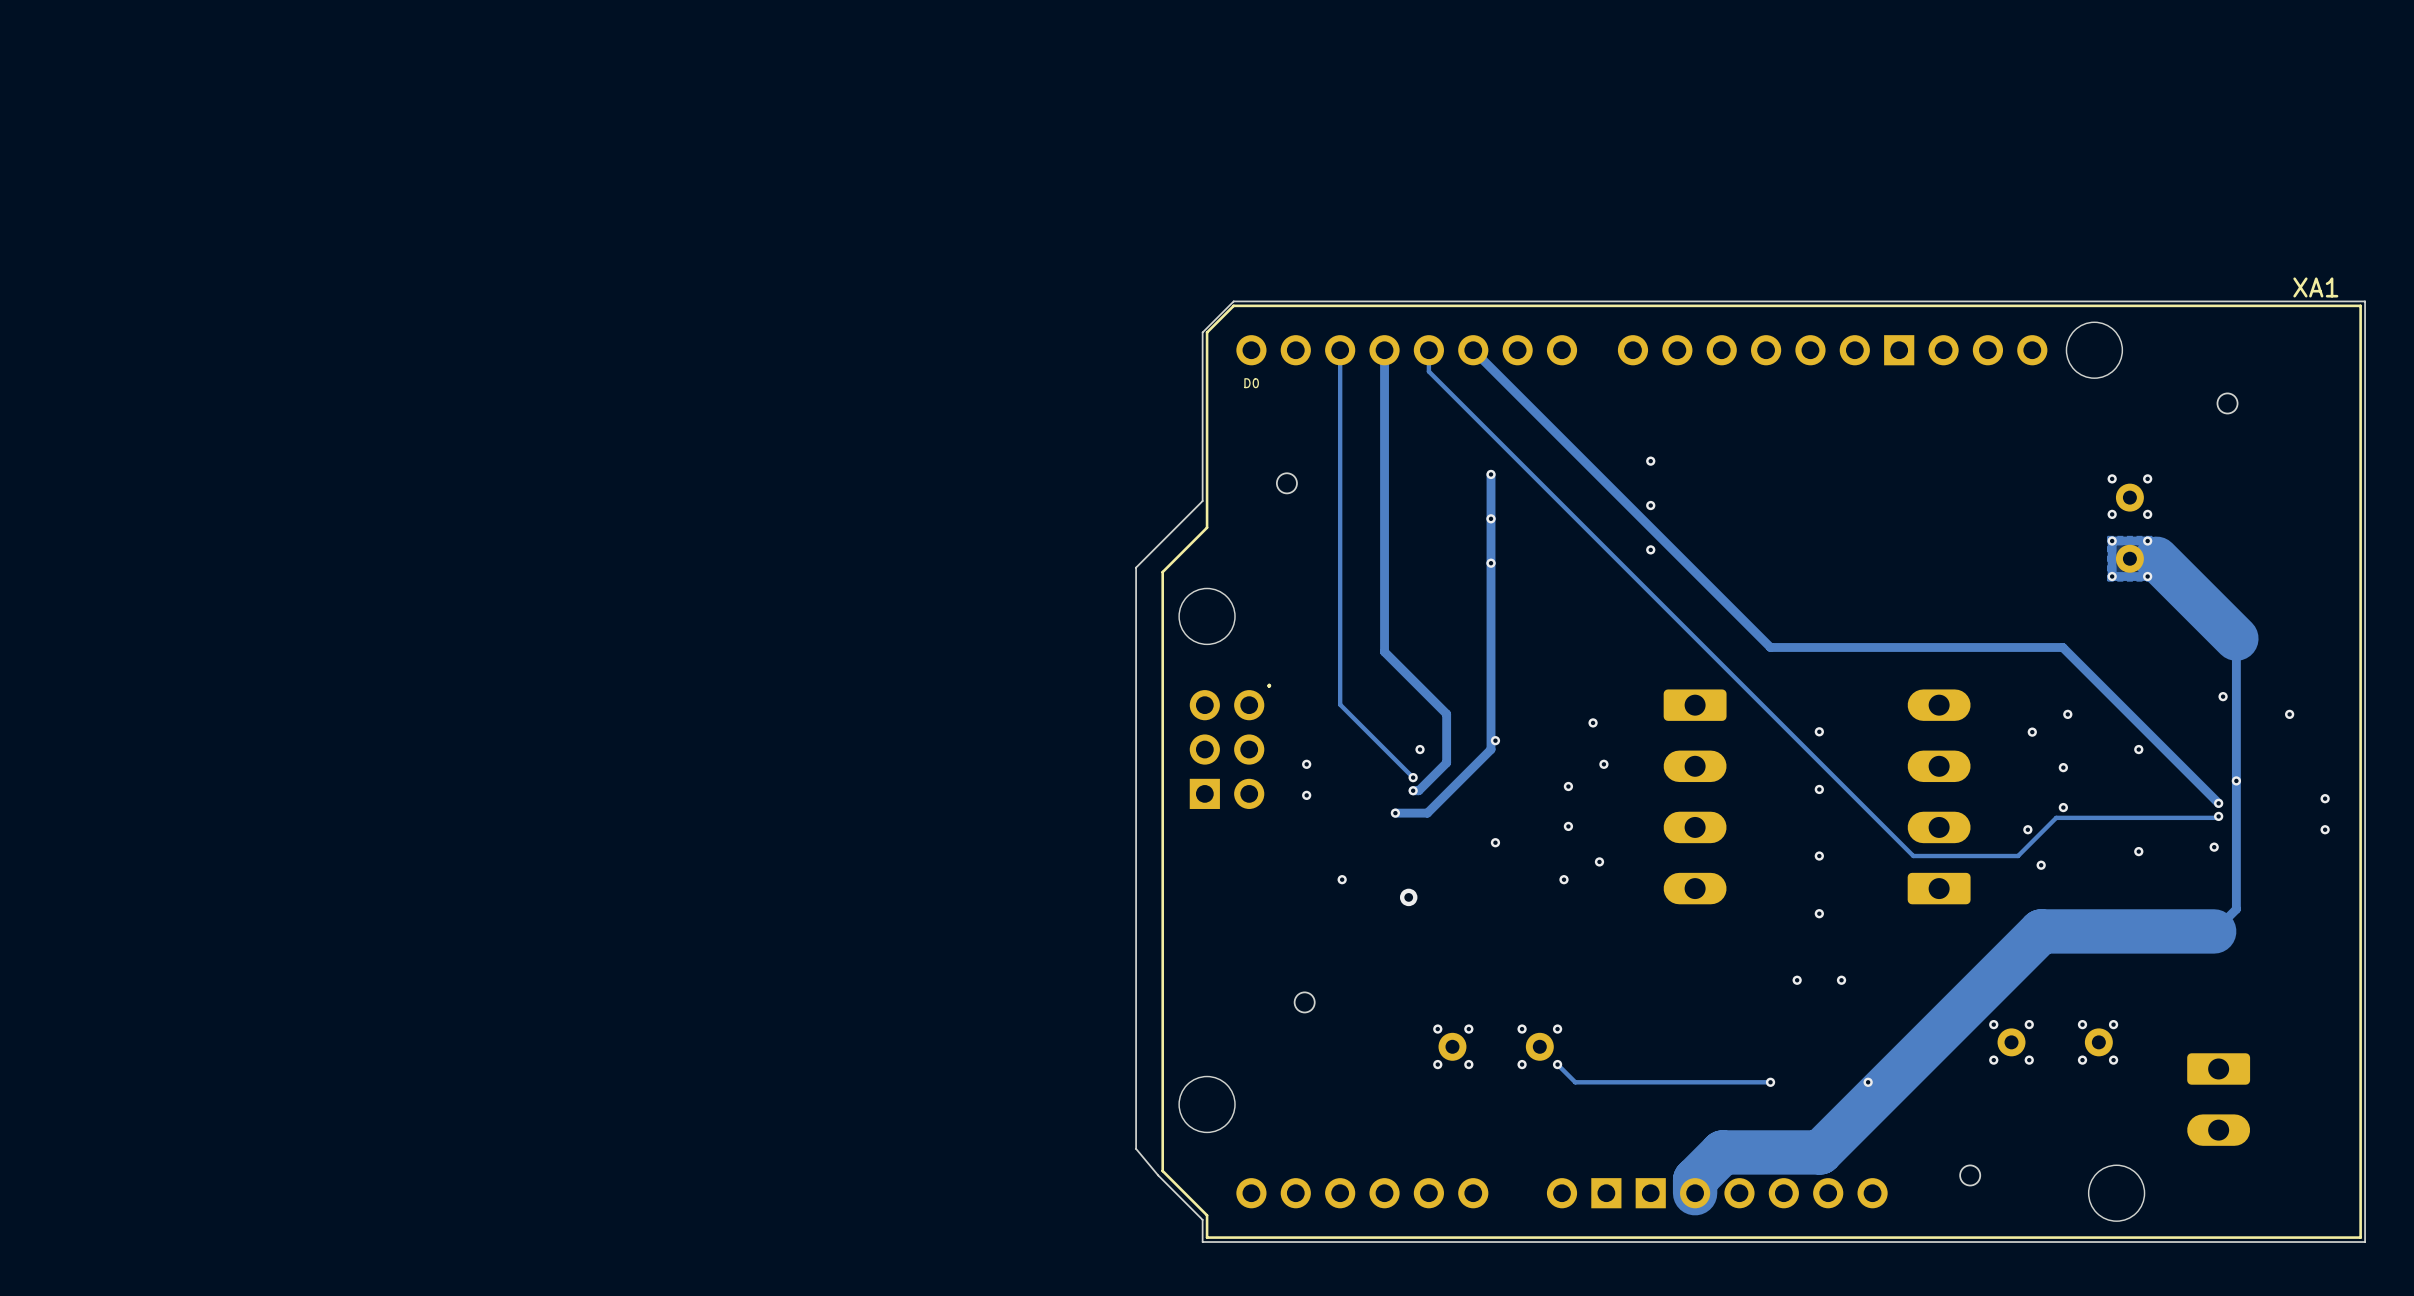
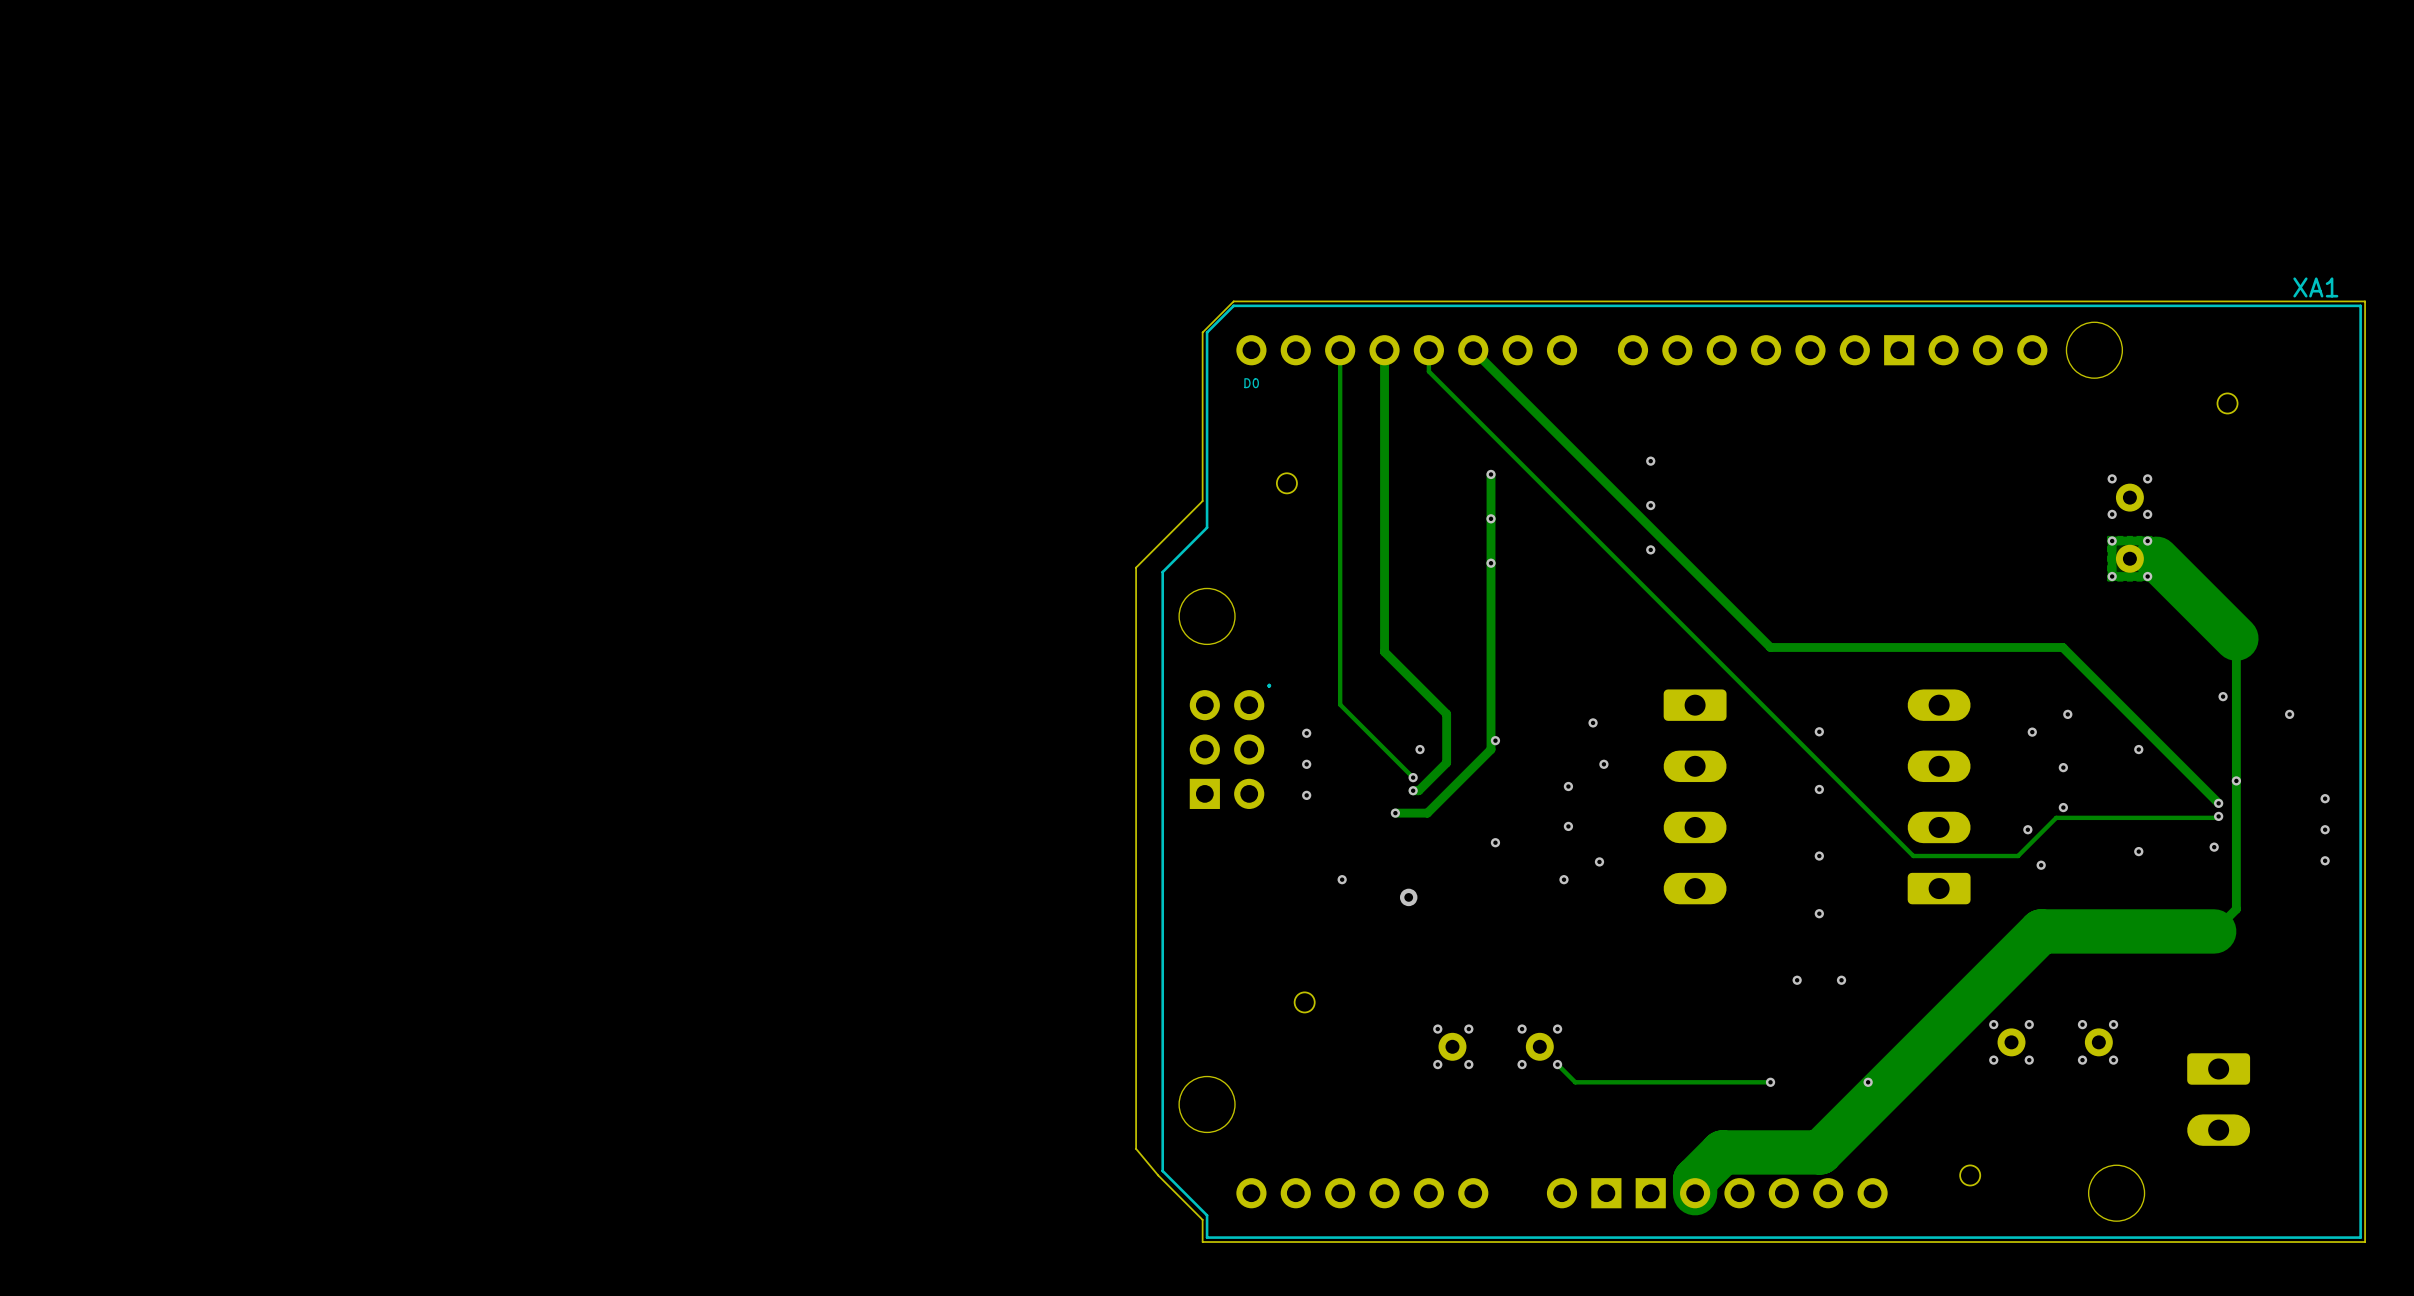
via: none -> (1306, 733)
via: none -> (2325, 860)

